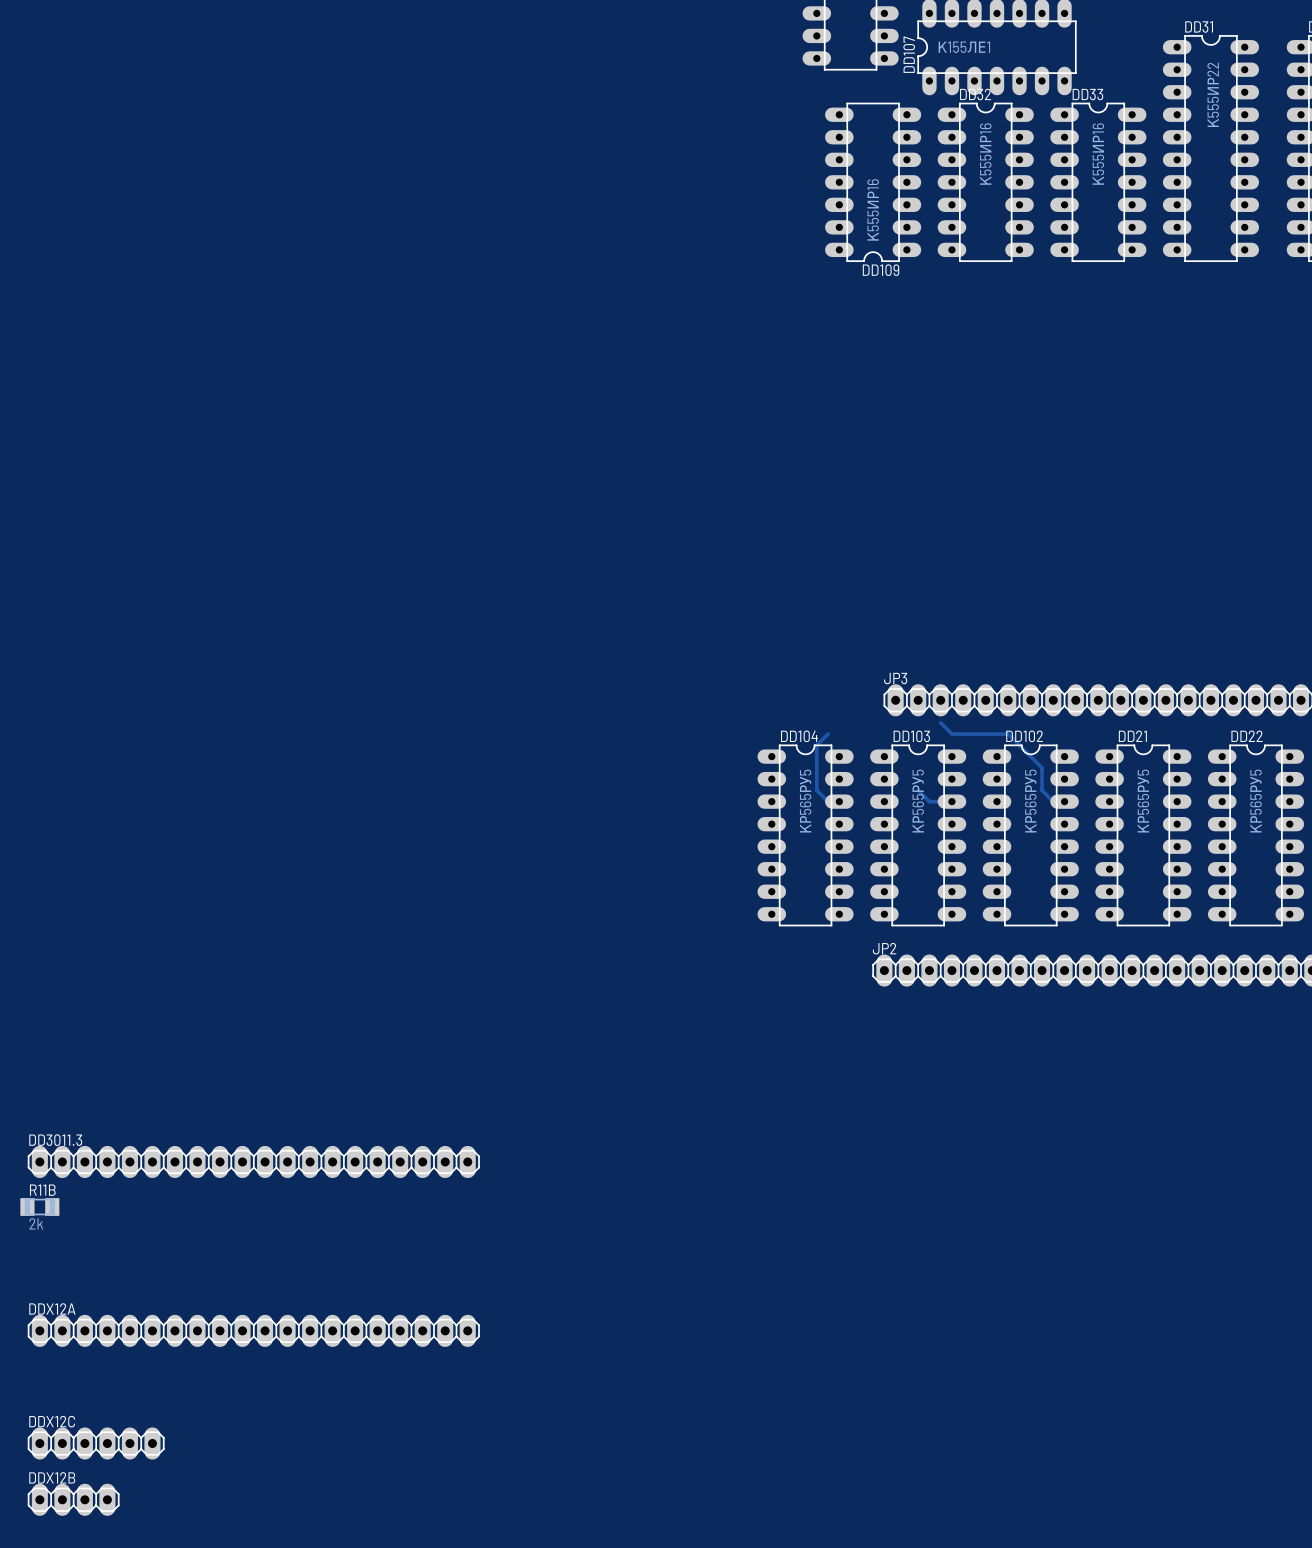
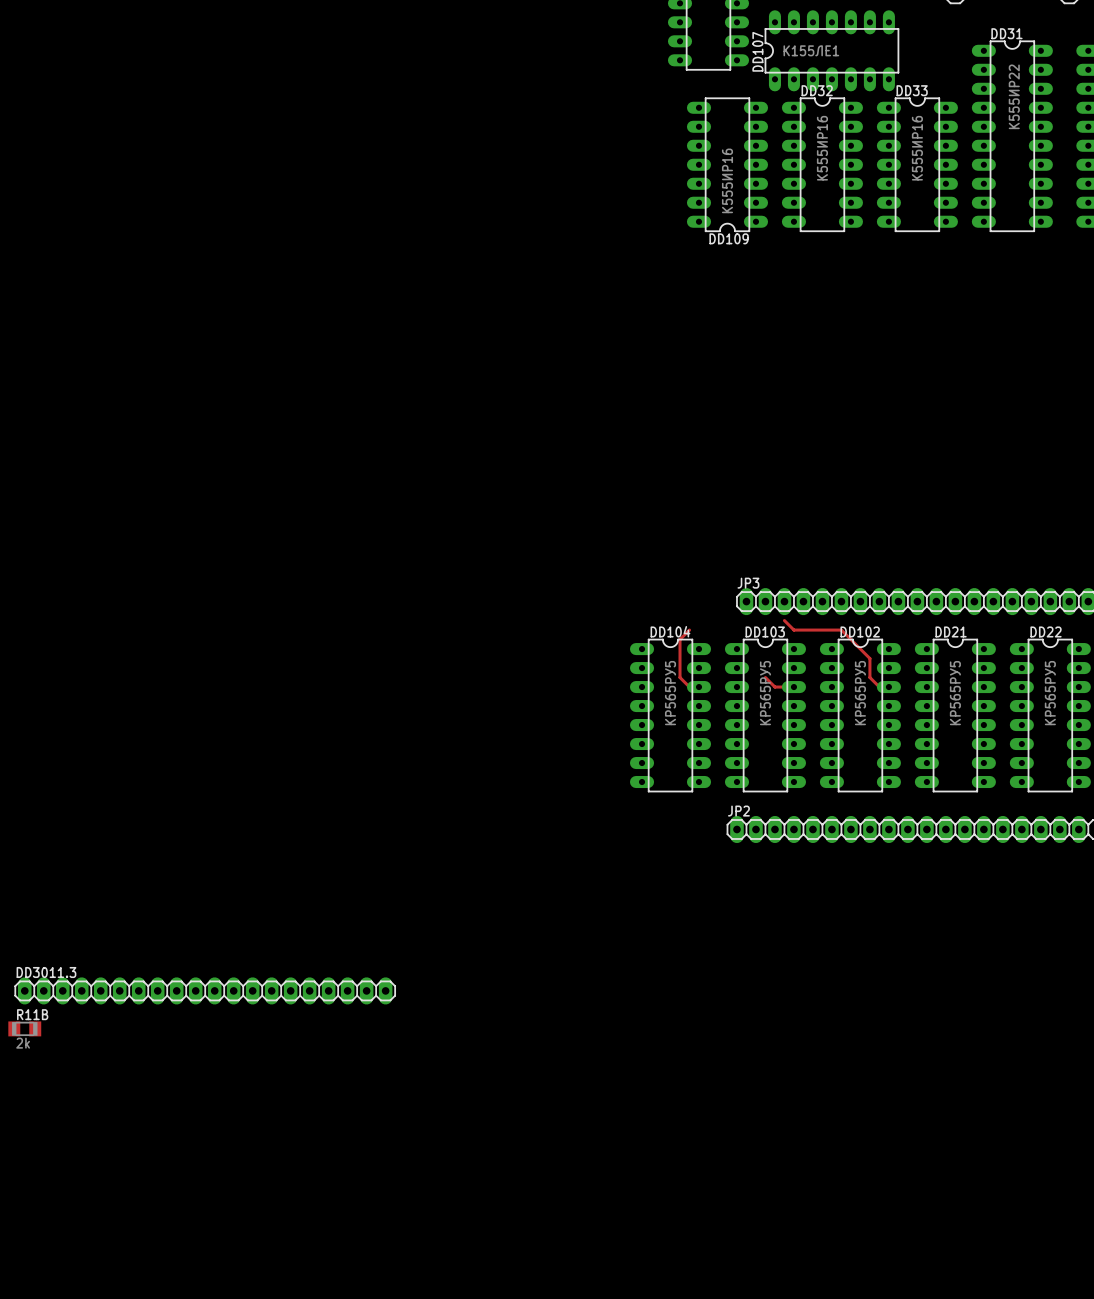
DDX12A: (253, 1330) -> none
DDX12C: (96, 1443) -> none
DDX12B: (73, 1499) -> none

